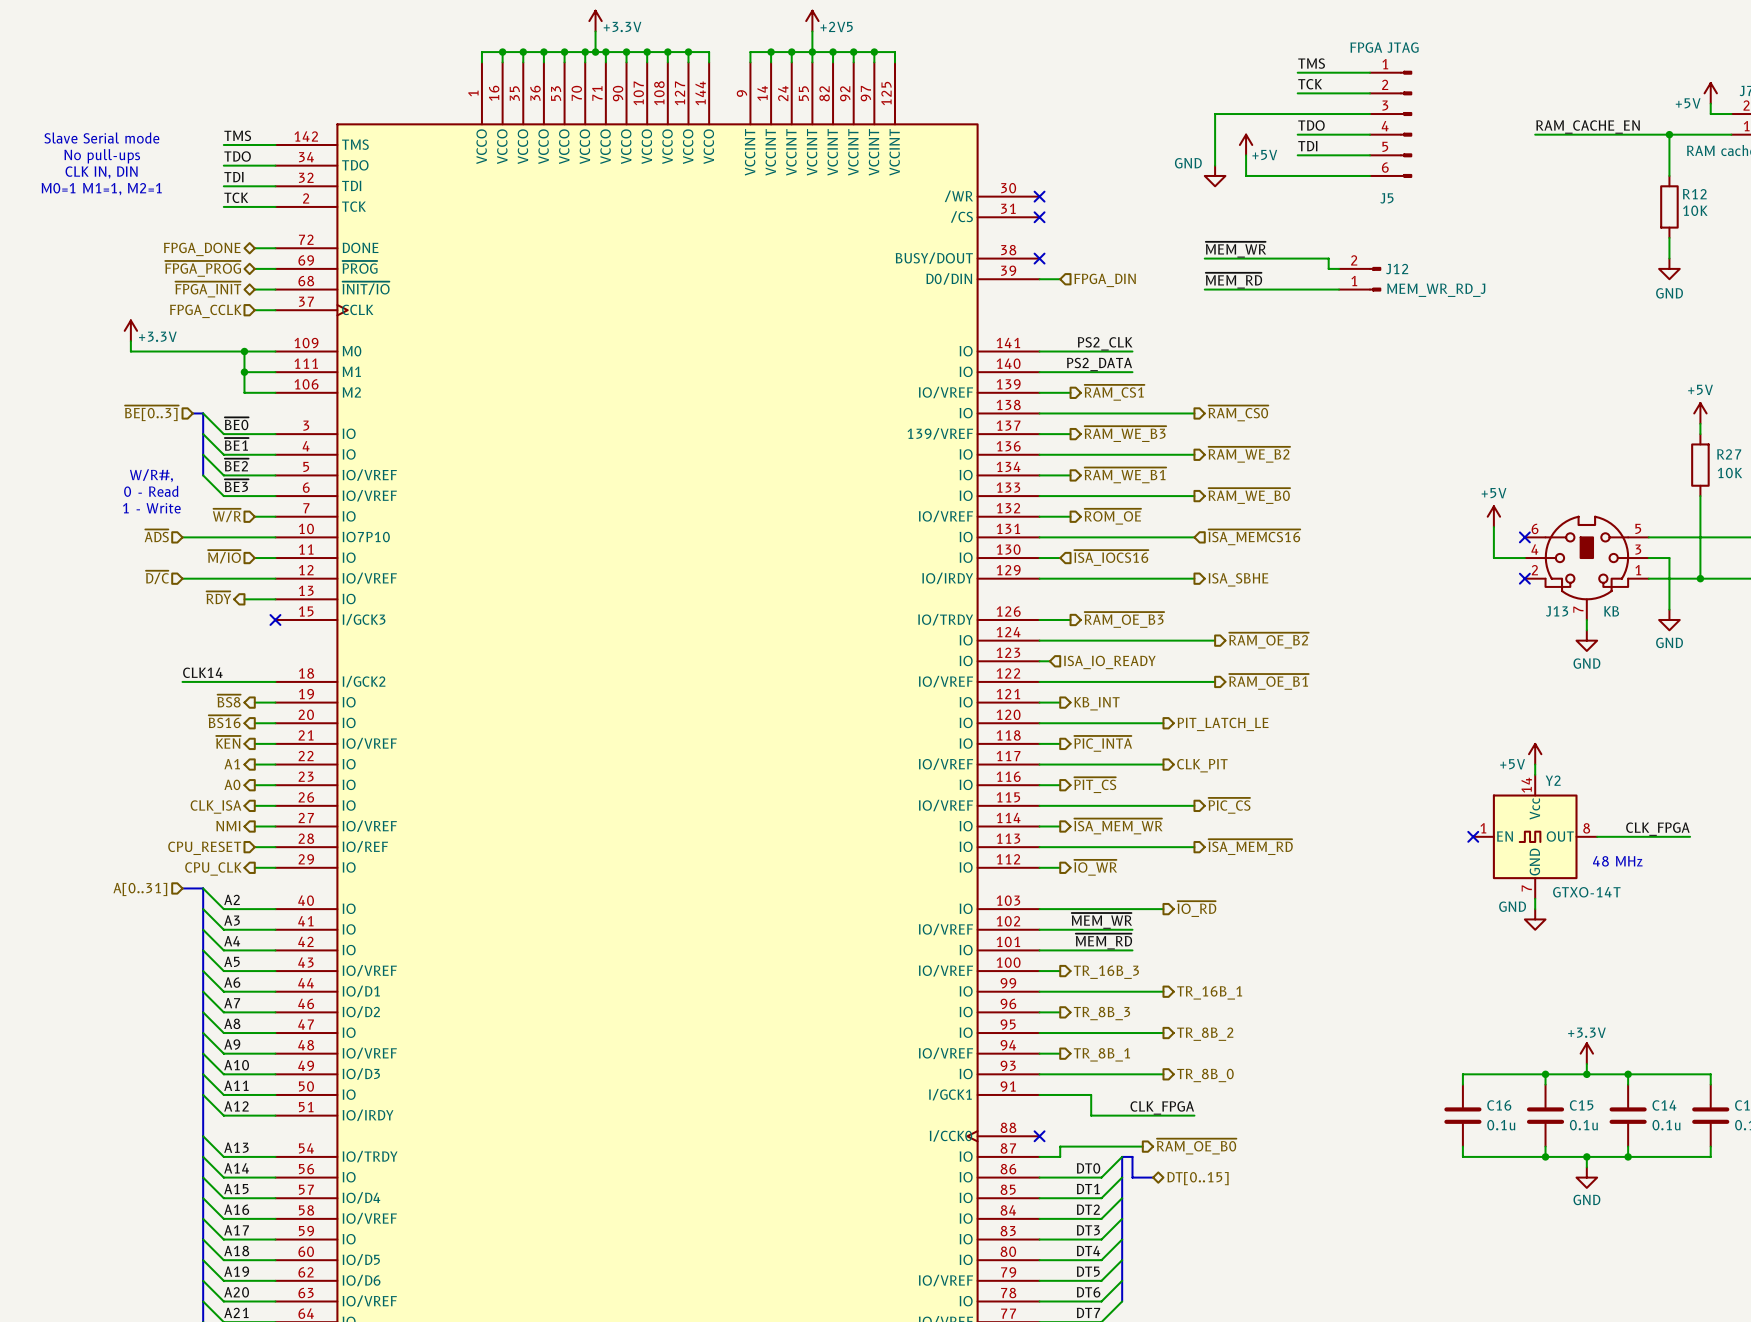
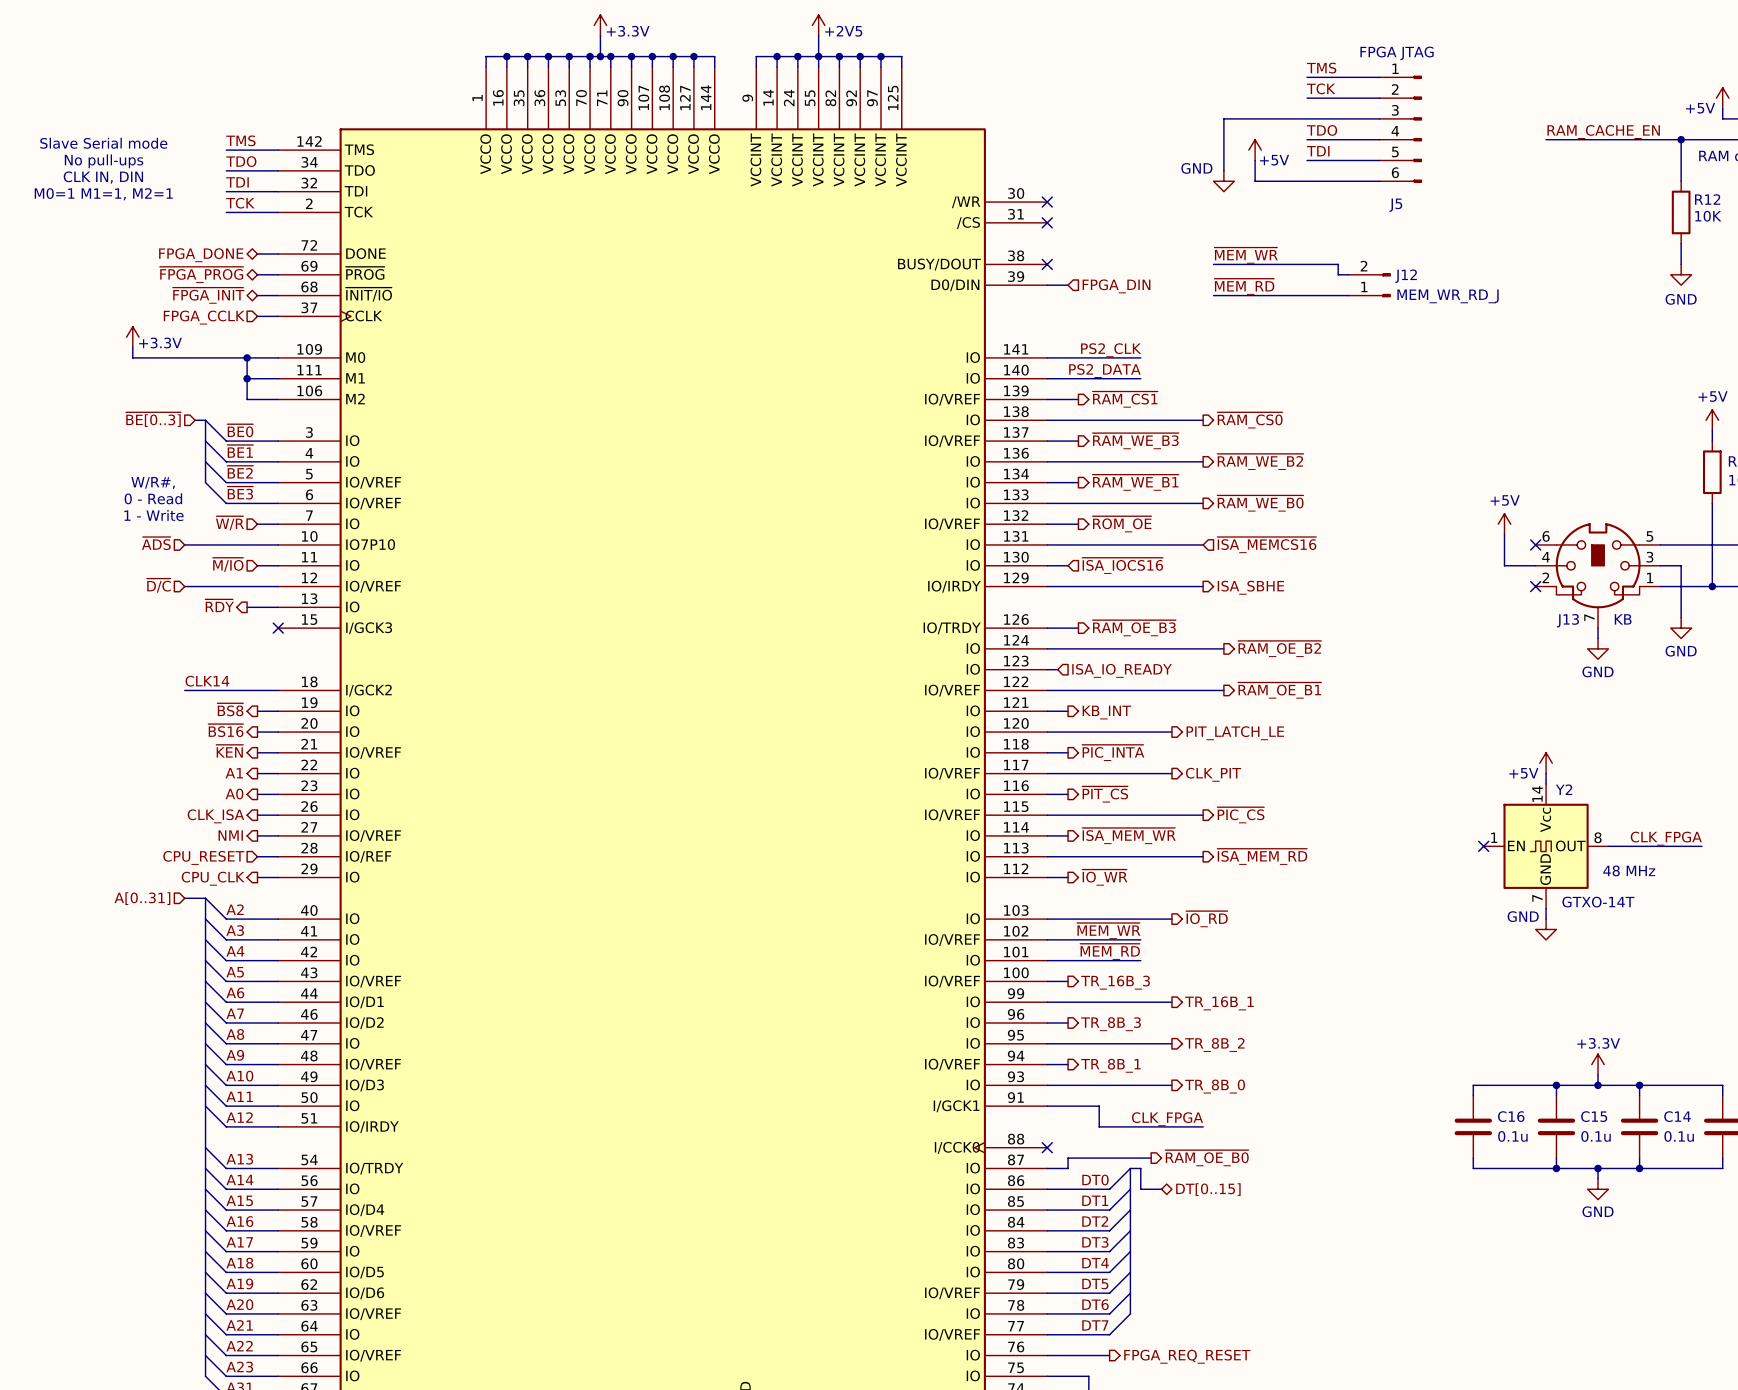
part pin name: 139/VREF (940, 433) -> IO/VREF (952, 441)

